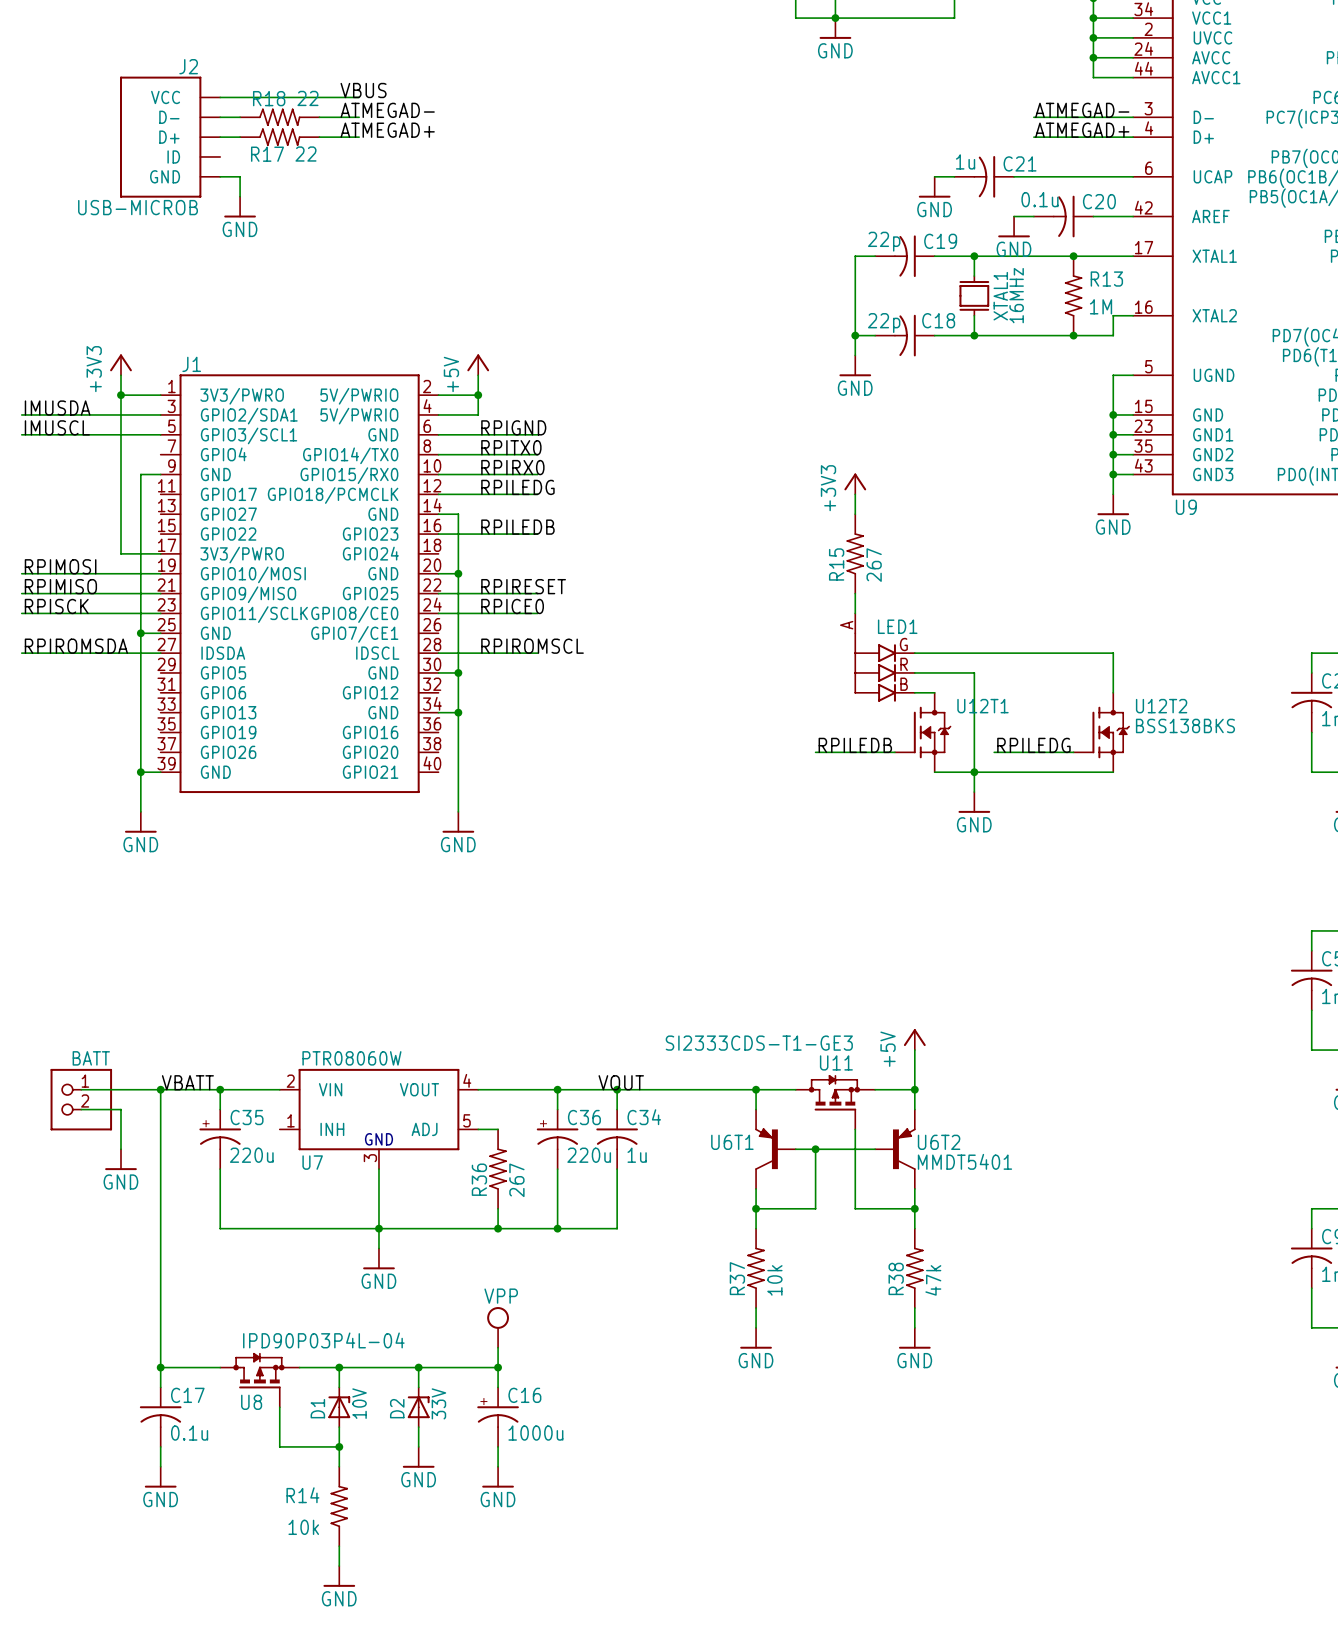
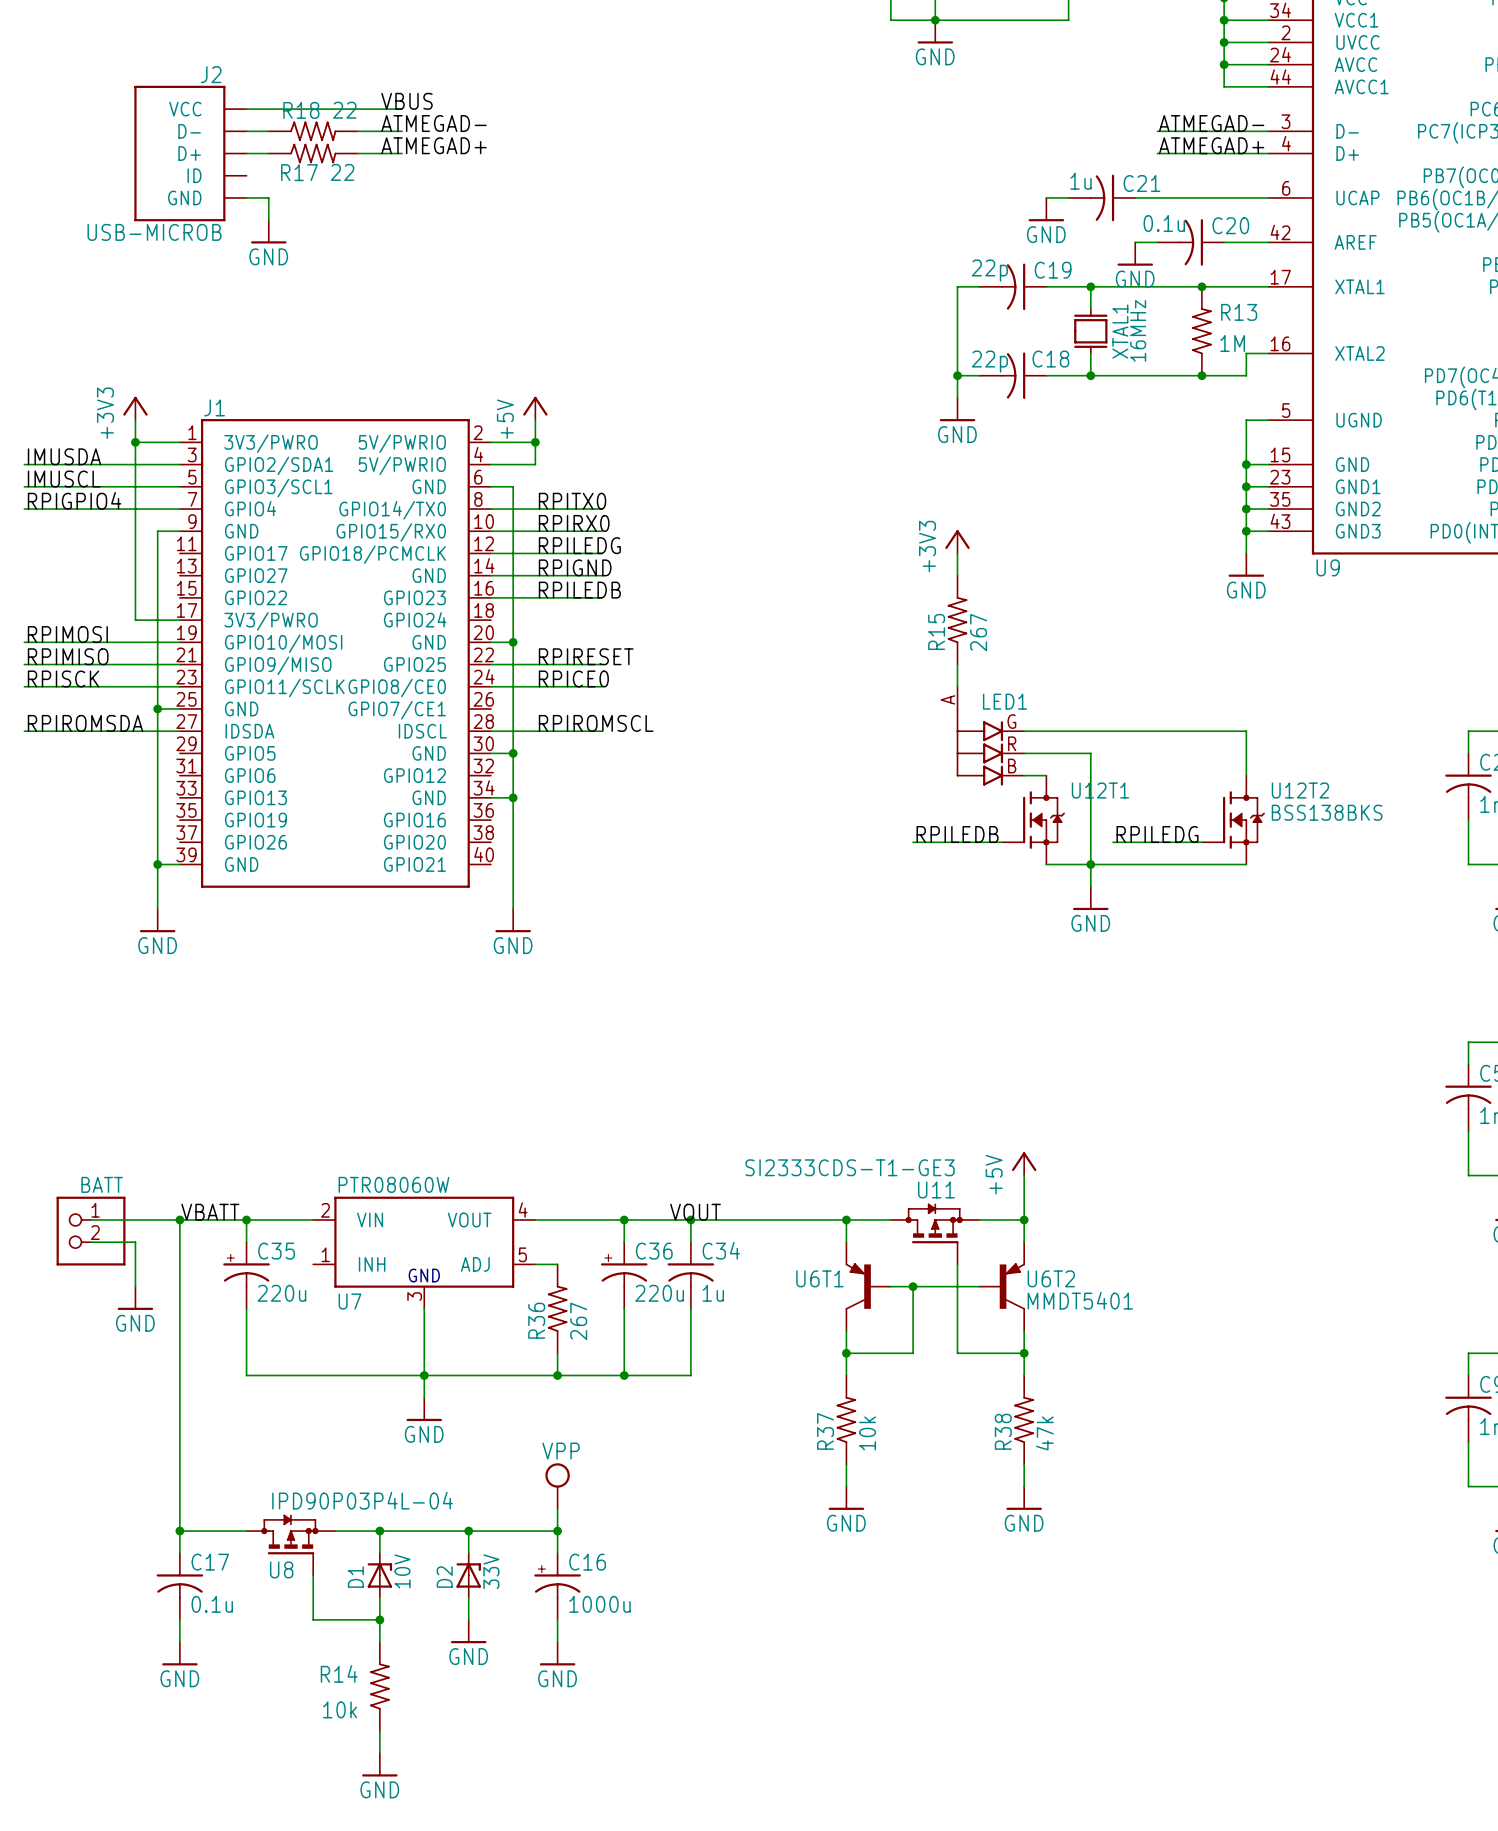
label position: RPIGND (513, 427) -> RPIGND (575, 567)
wire: (458, 434) (537, 434) -> (513, 486) (513, 575) (602, 575)
label: none -> RPIGPIO4 (74, 500)
wire: none -> (24, 509) (179, 509)

